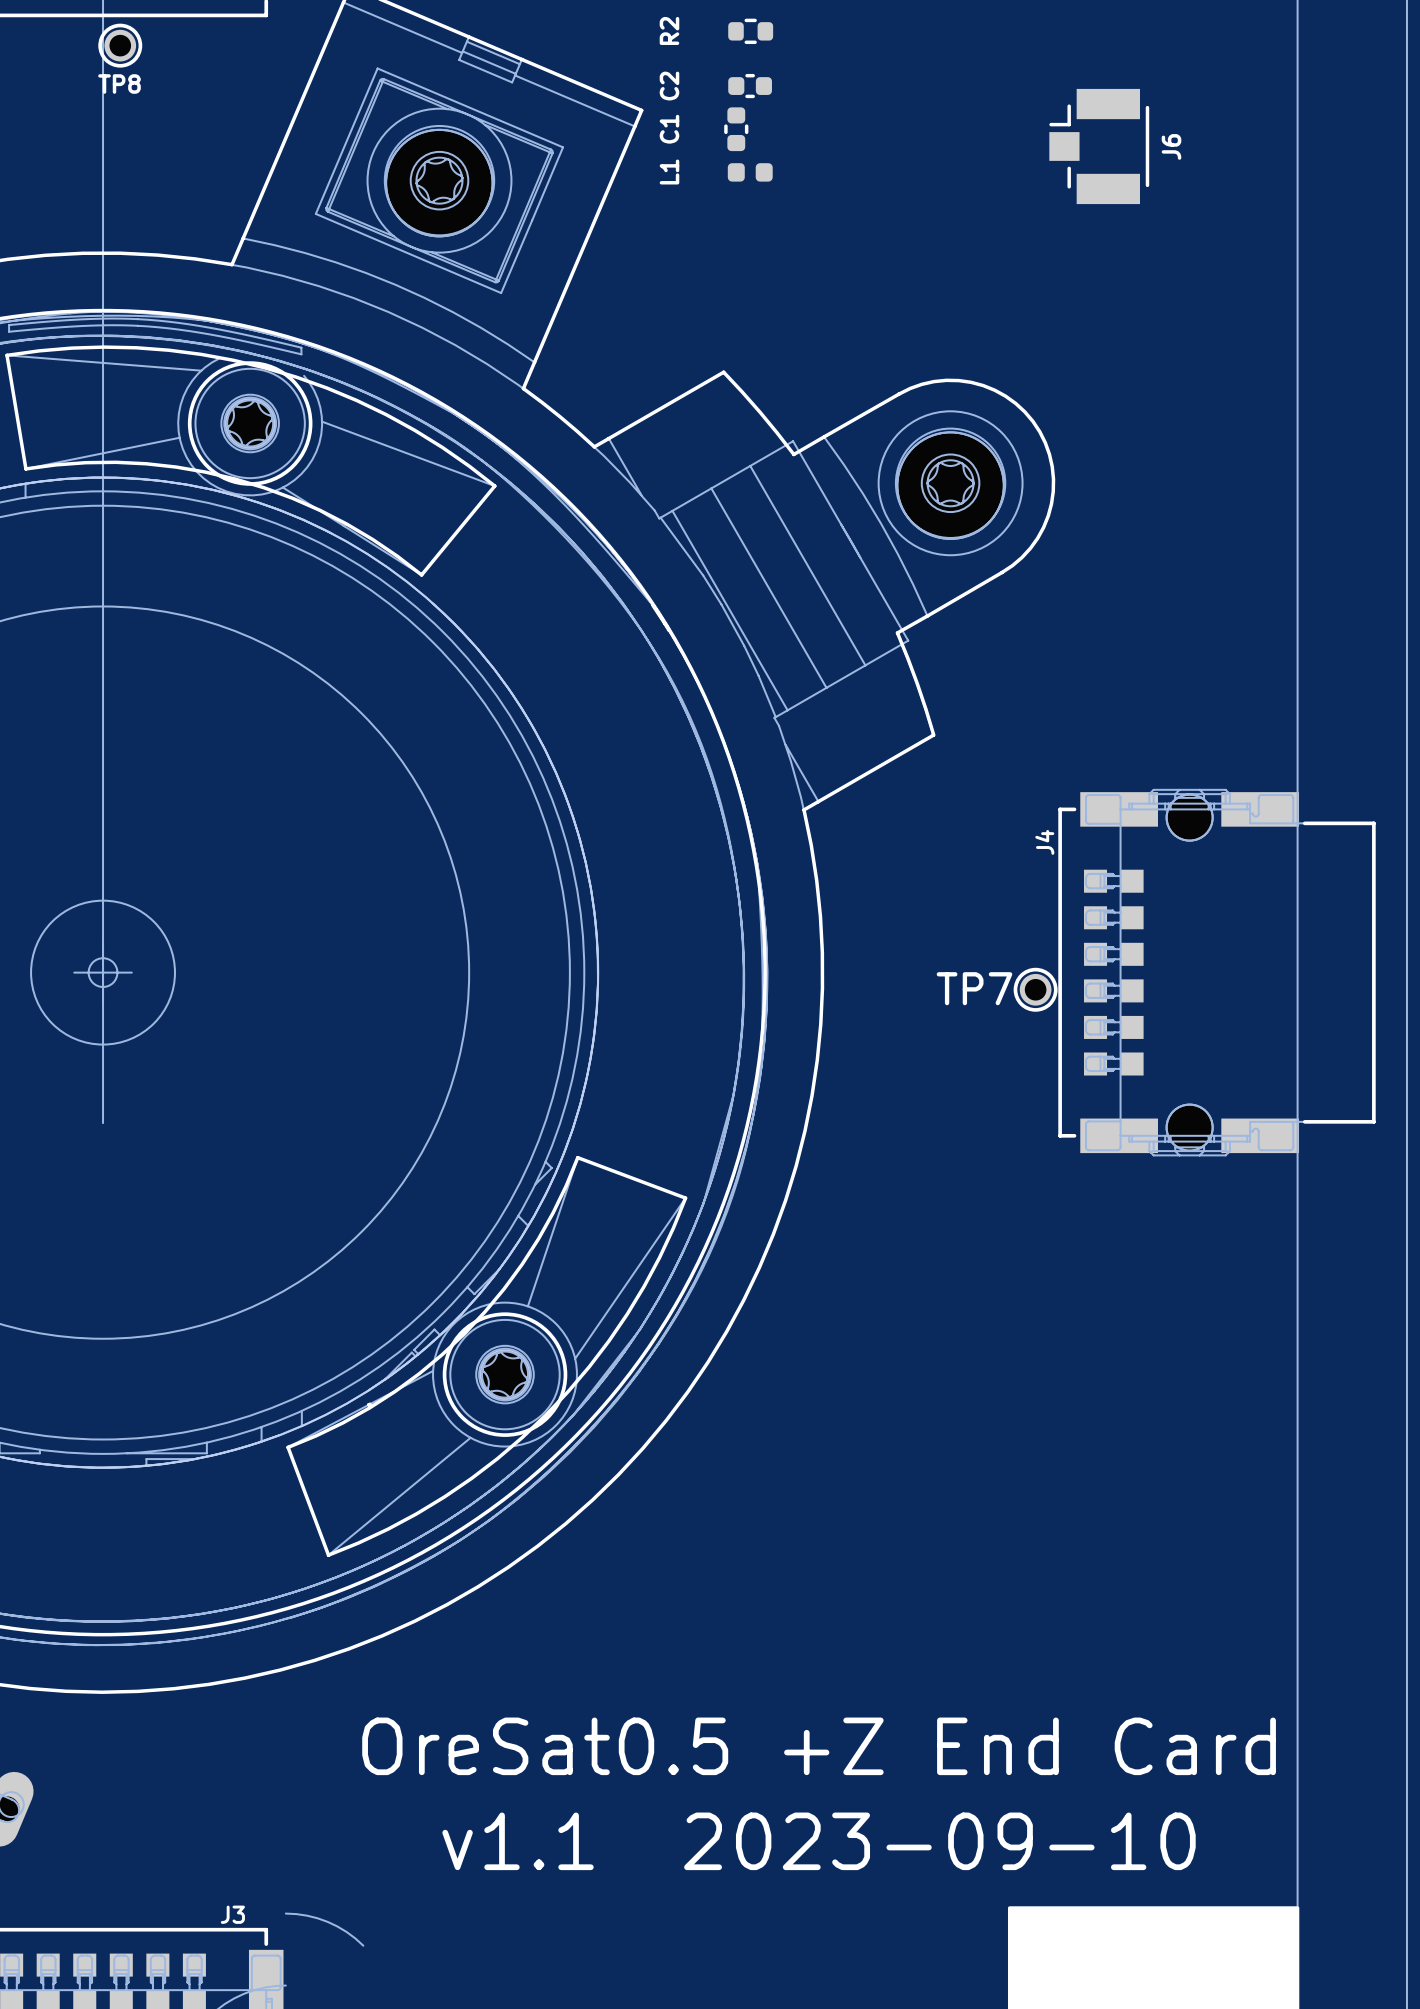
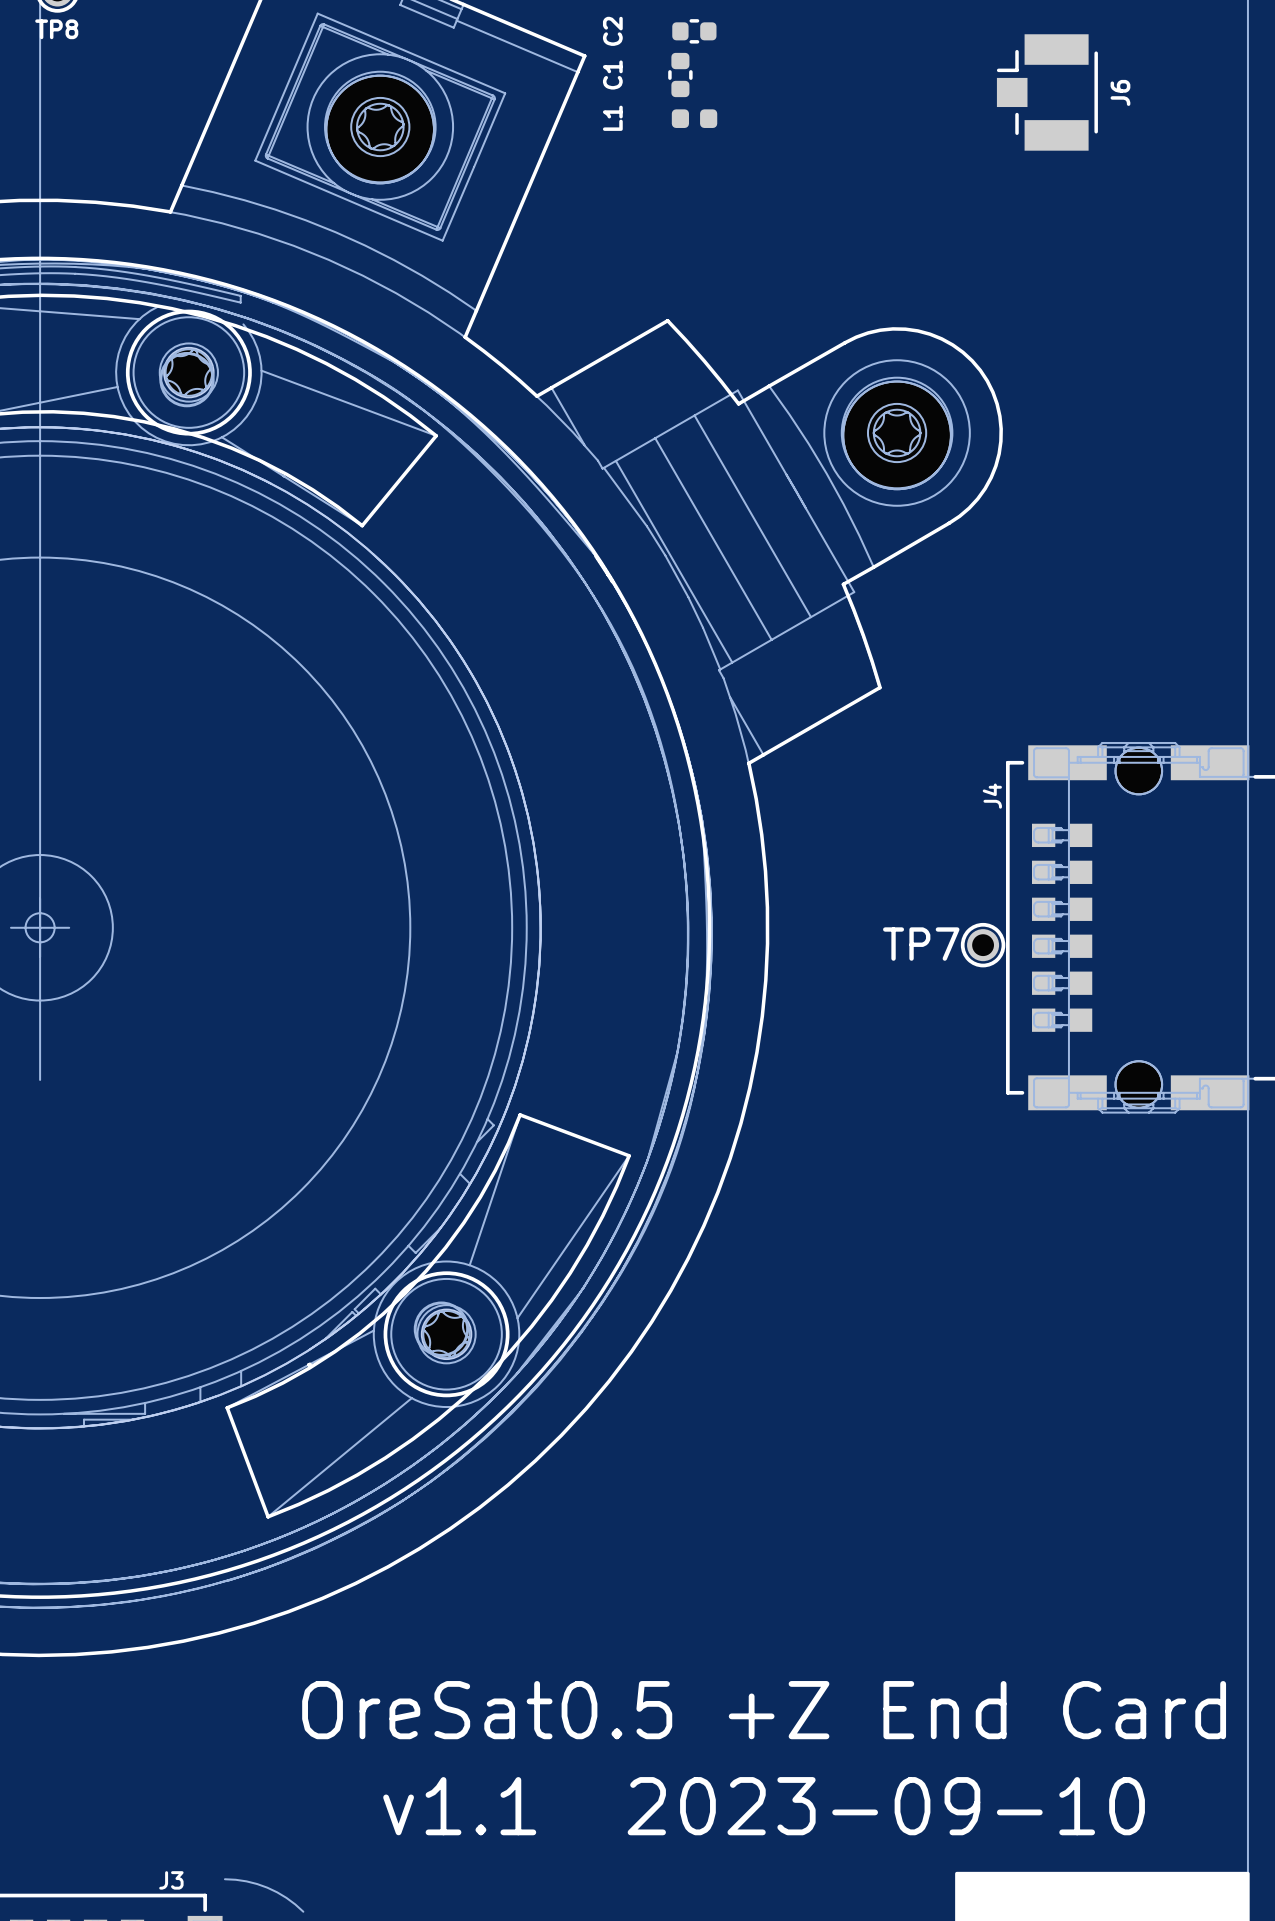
drawing shape: [224, 397, 277, 450] -> [159, 351, 215, 408]
drawing shape: [478, 1348, 532, 1401] -> [413, 1301, 470, 1357]

